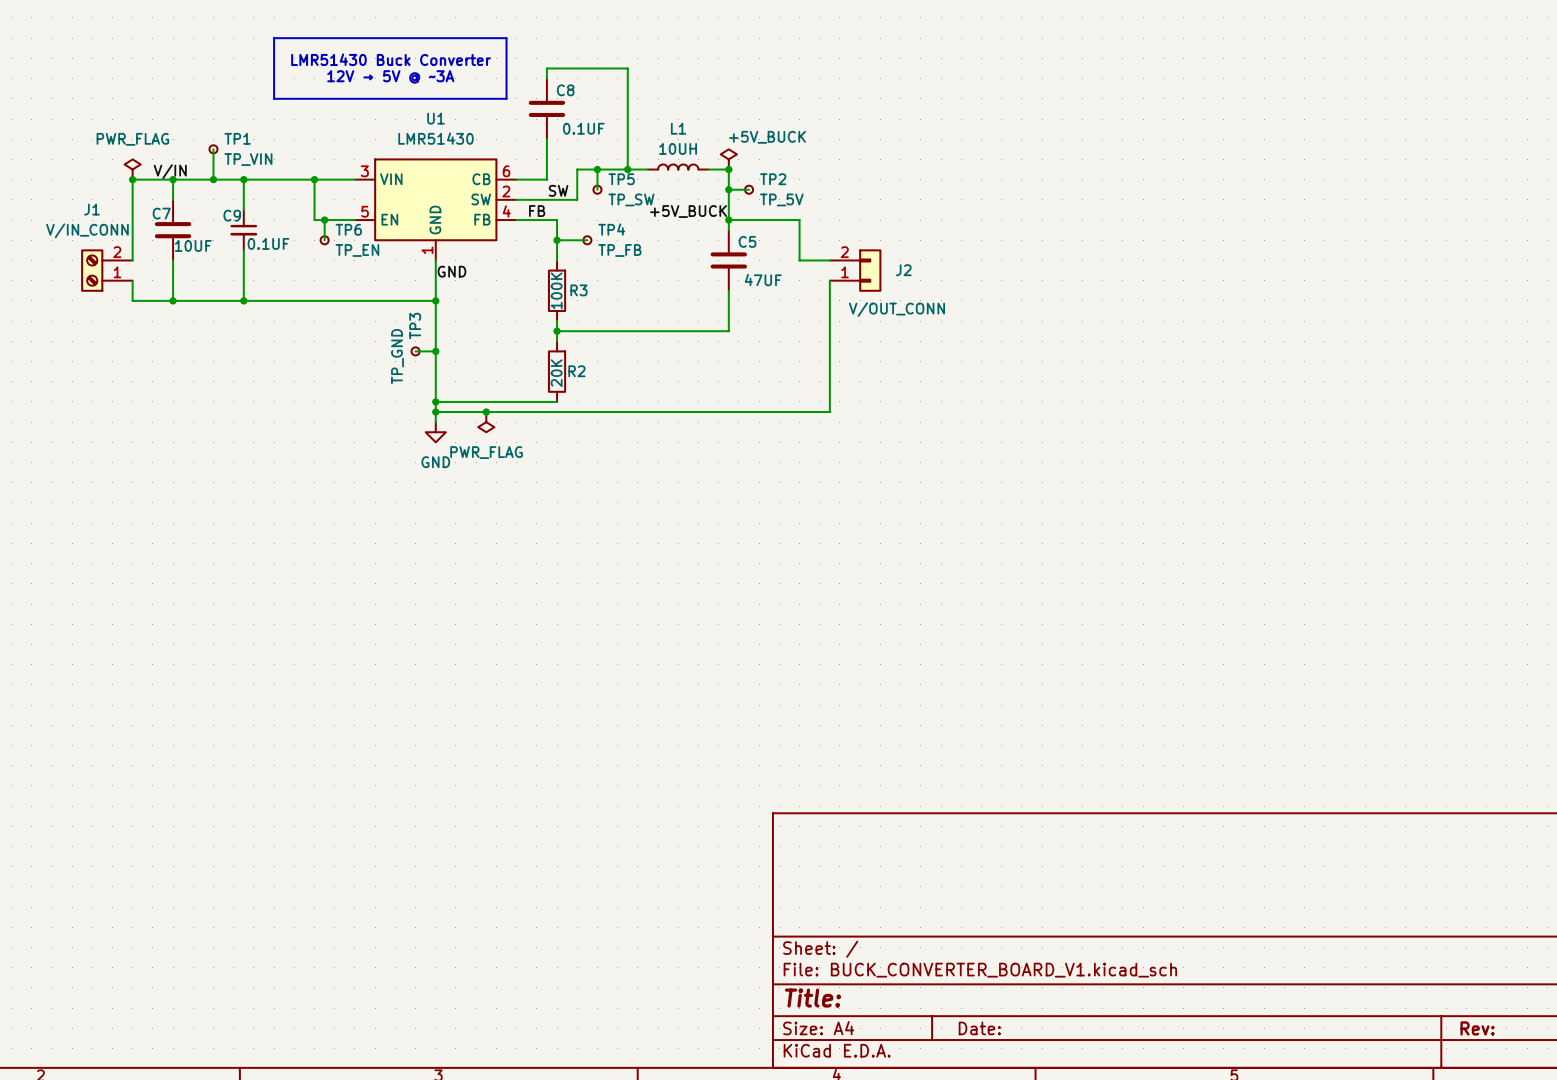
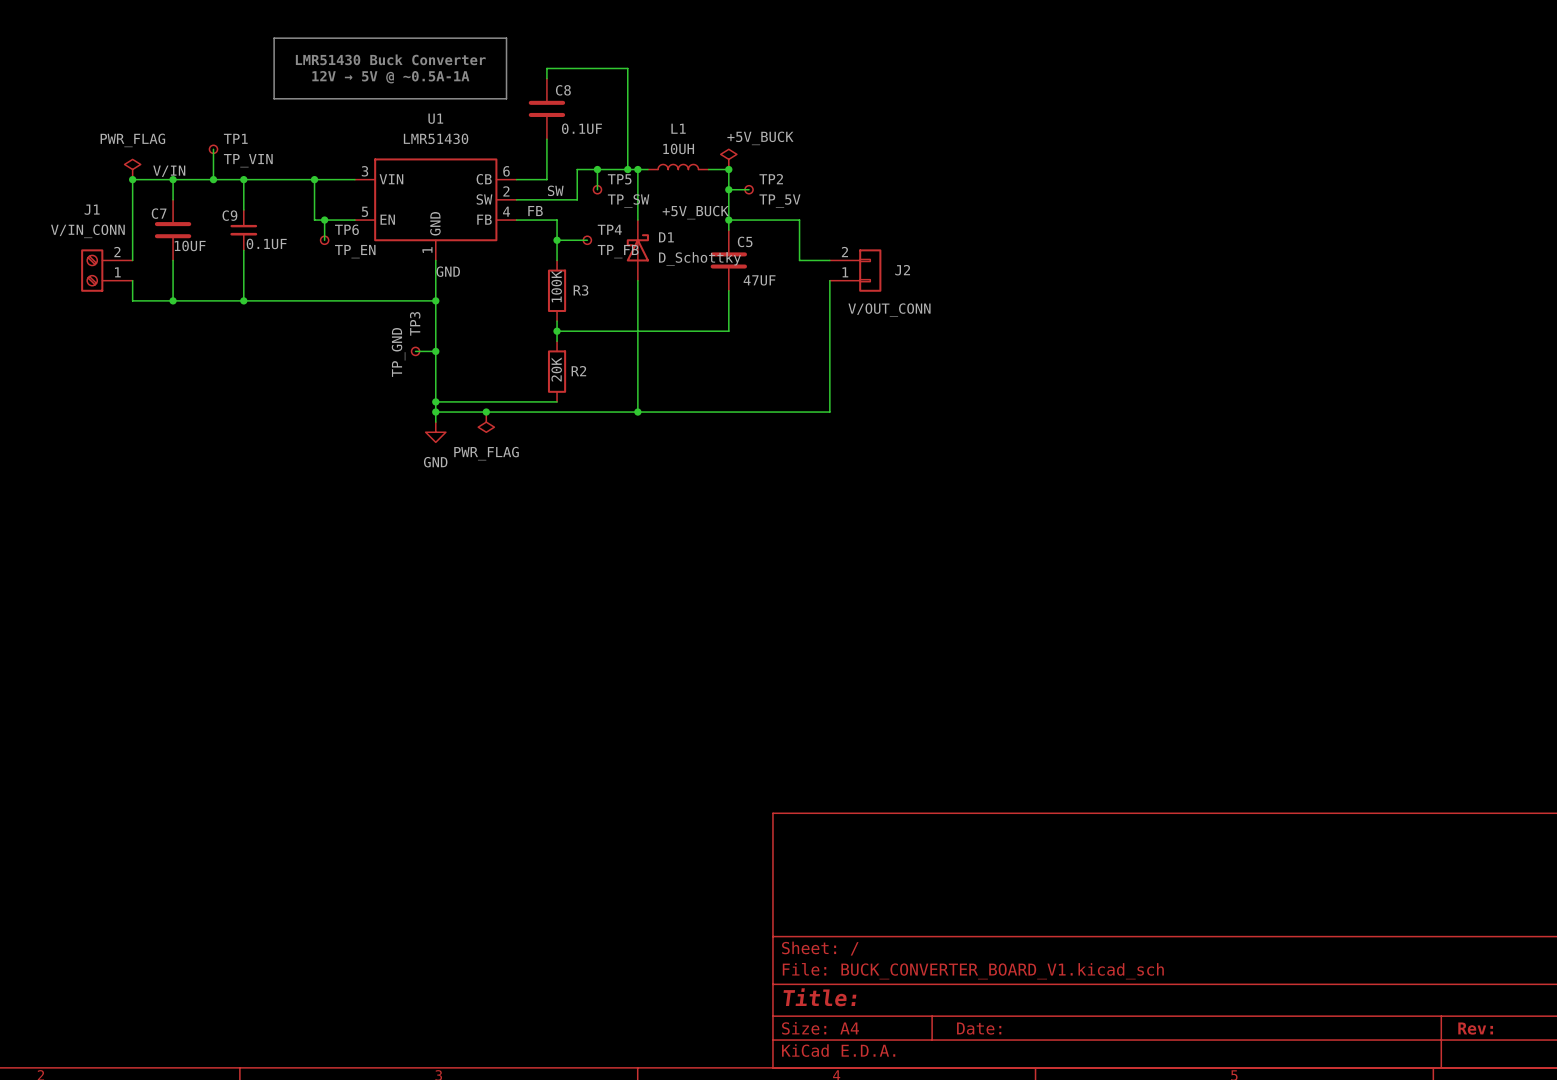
text: 12V → 5V @ ~3A (390, 76) -> 12V → 5V @ ~0.5A-1A (390, 77)
wire: none -> (637, 169) (637, 220)
junction: none -> (637, 169)
D1: none -> D_Schottky (637, 250)
wire: none -> (637, 280) (637, 412)
junction: none -> (637, 412)

